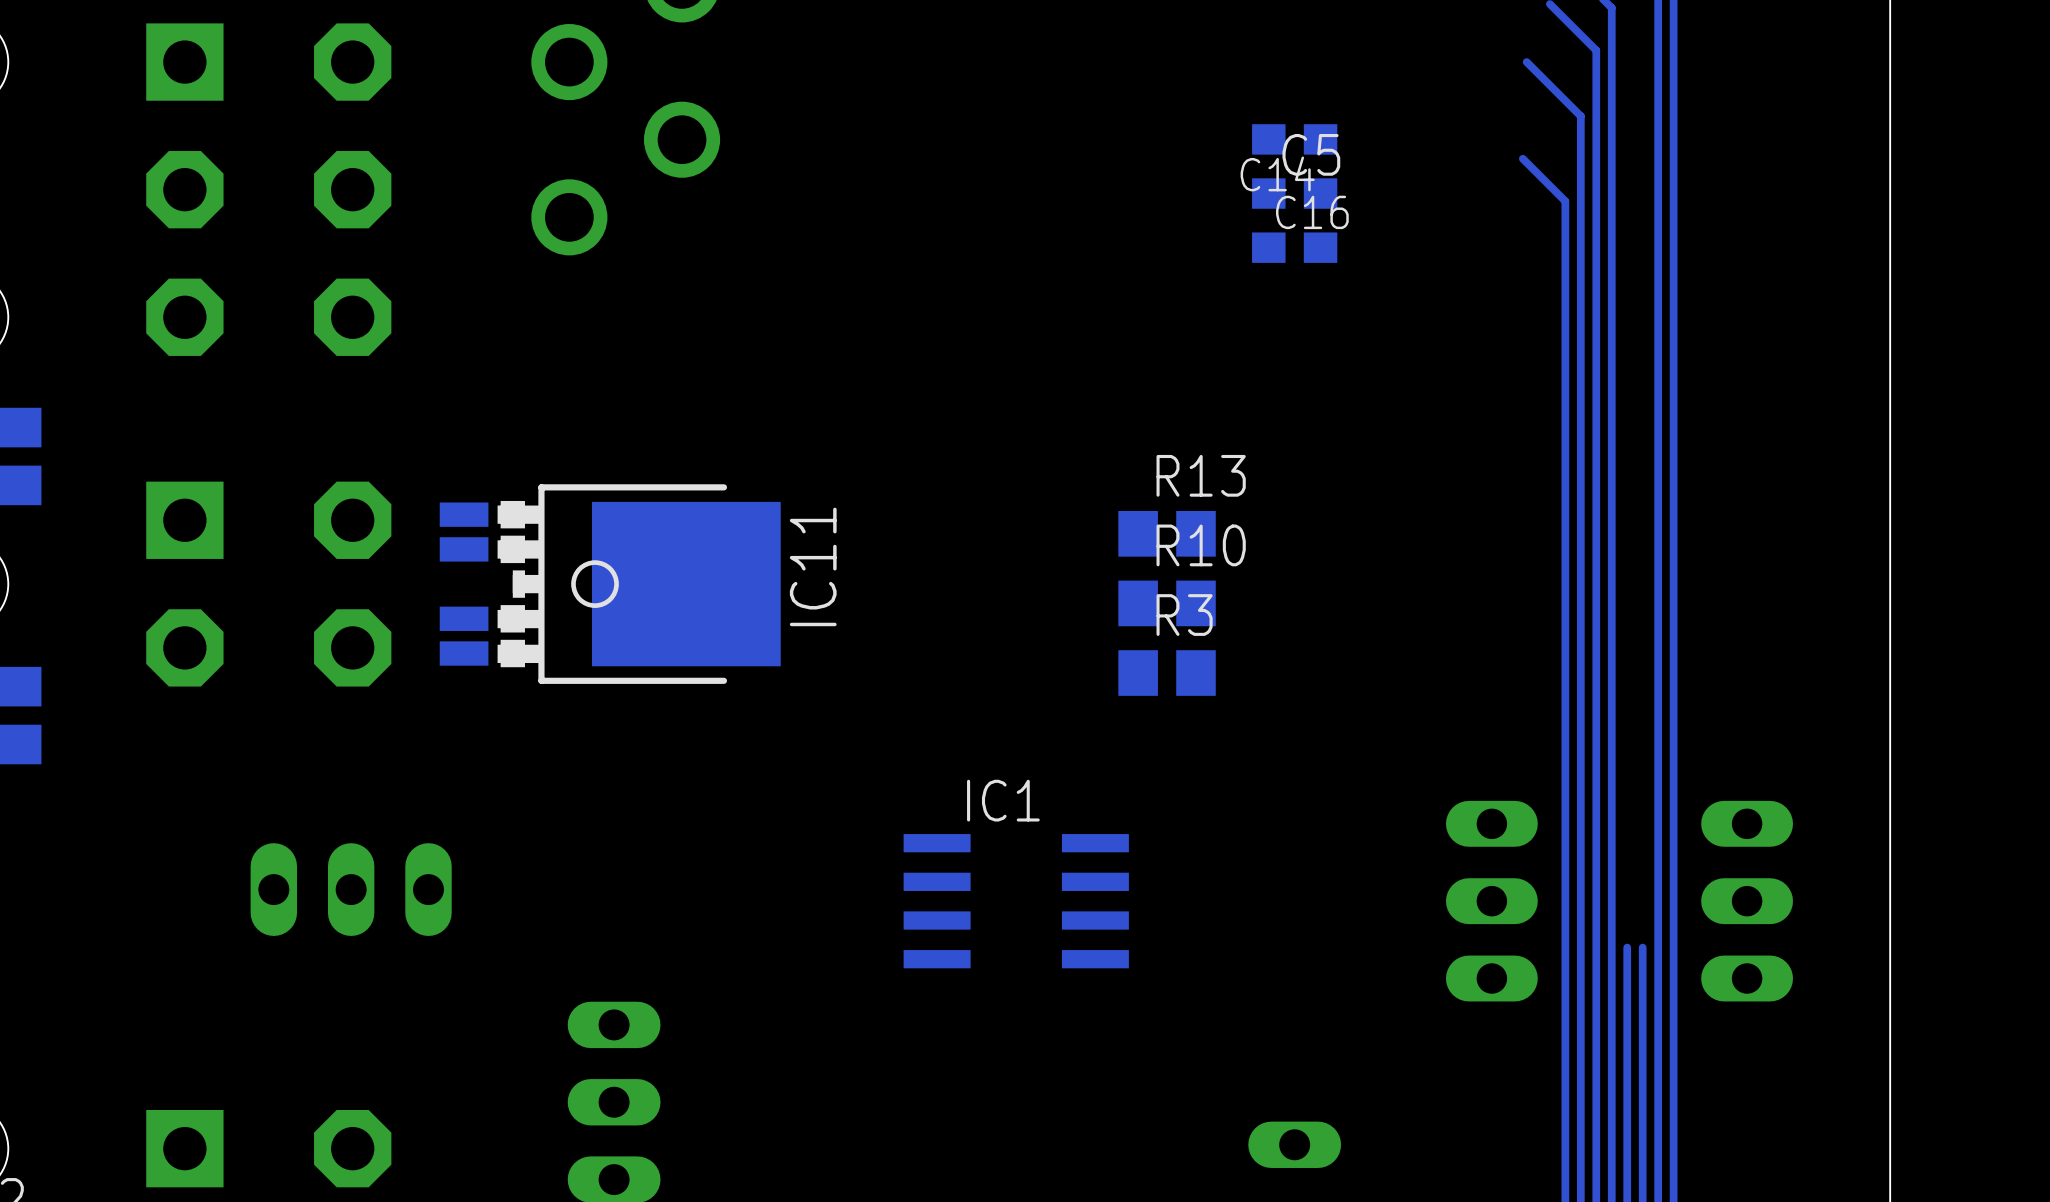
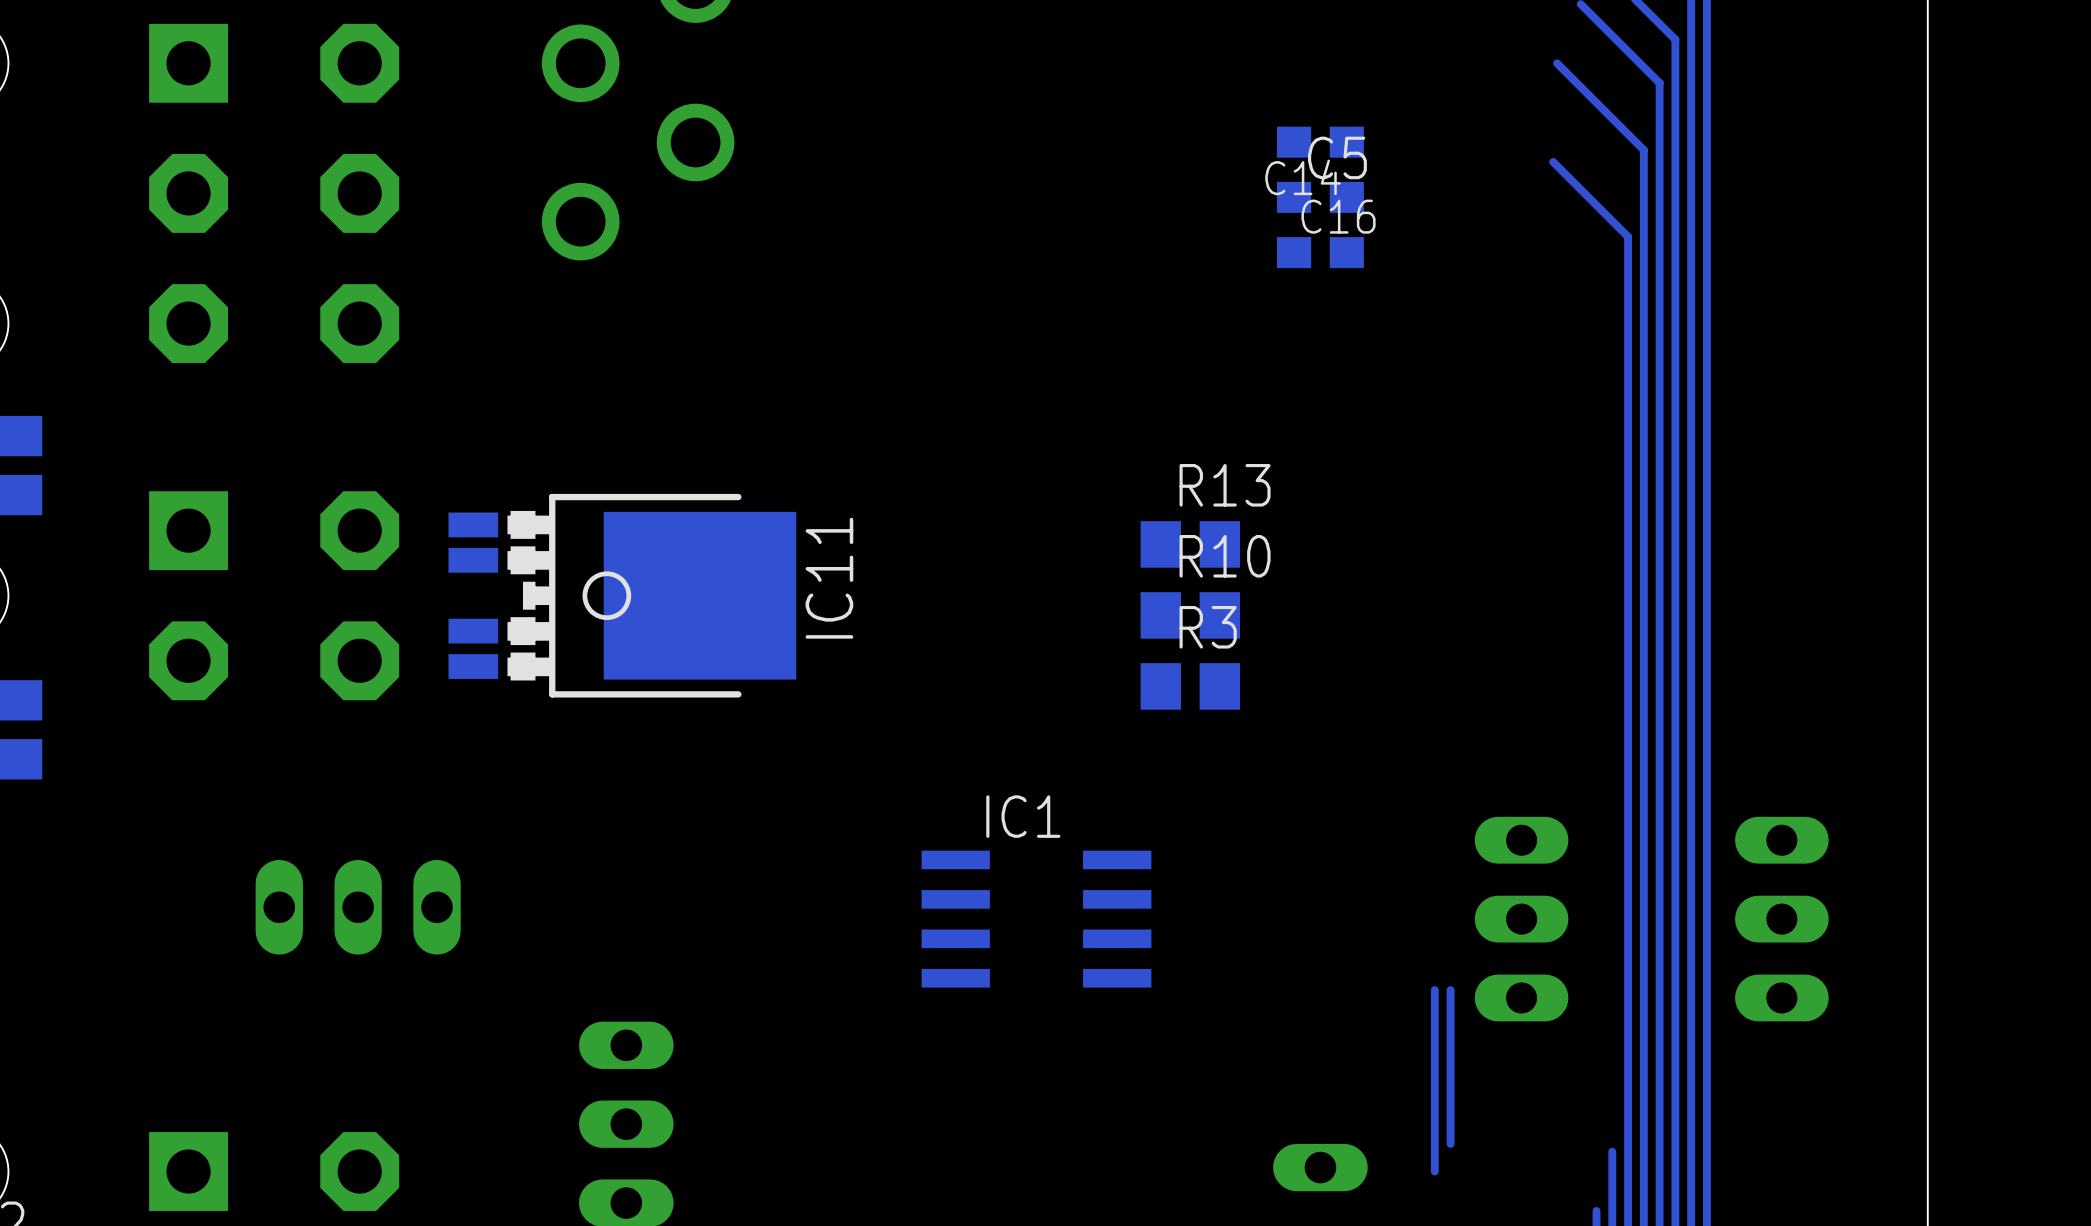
track: (1611, 7) (1611, 147) -> (1612, 118) (1643, 150)
track: none -> (1643, 8) (1675, 39) (1675, 966)
track: (1596, 50) (1596, 232) -> (1596, 205) (1628, 236)
track: none -> (1628, 51) (1659, 83) (1659, 966)
track: (1580, 116) (1580, 1129) -> none
track: (1565, 201) (1565, 1187) -> none
track: none -> (1434, 990) (1434, 1171)
track: none -> (1450, 990) (1450, 1143)

